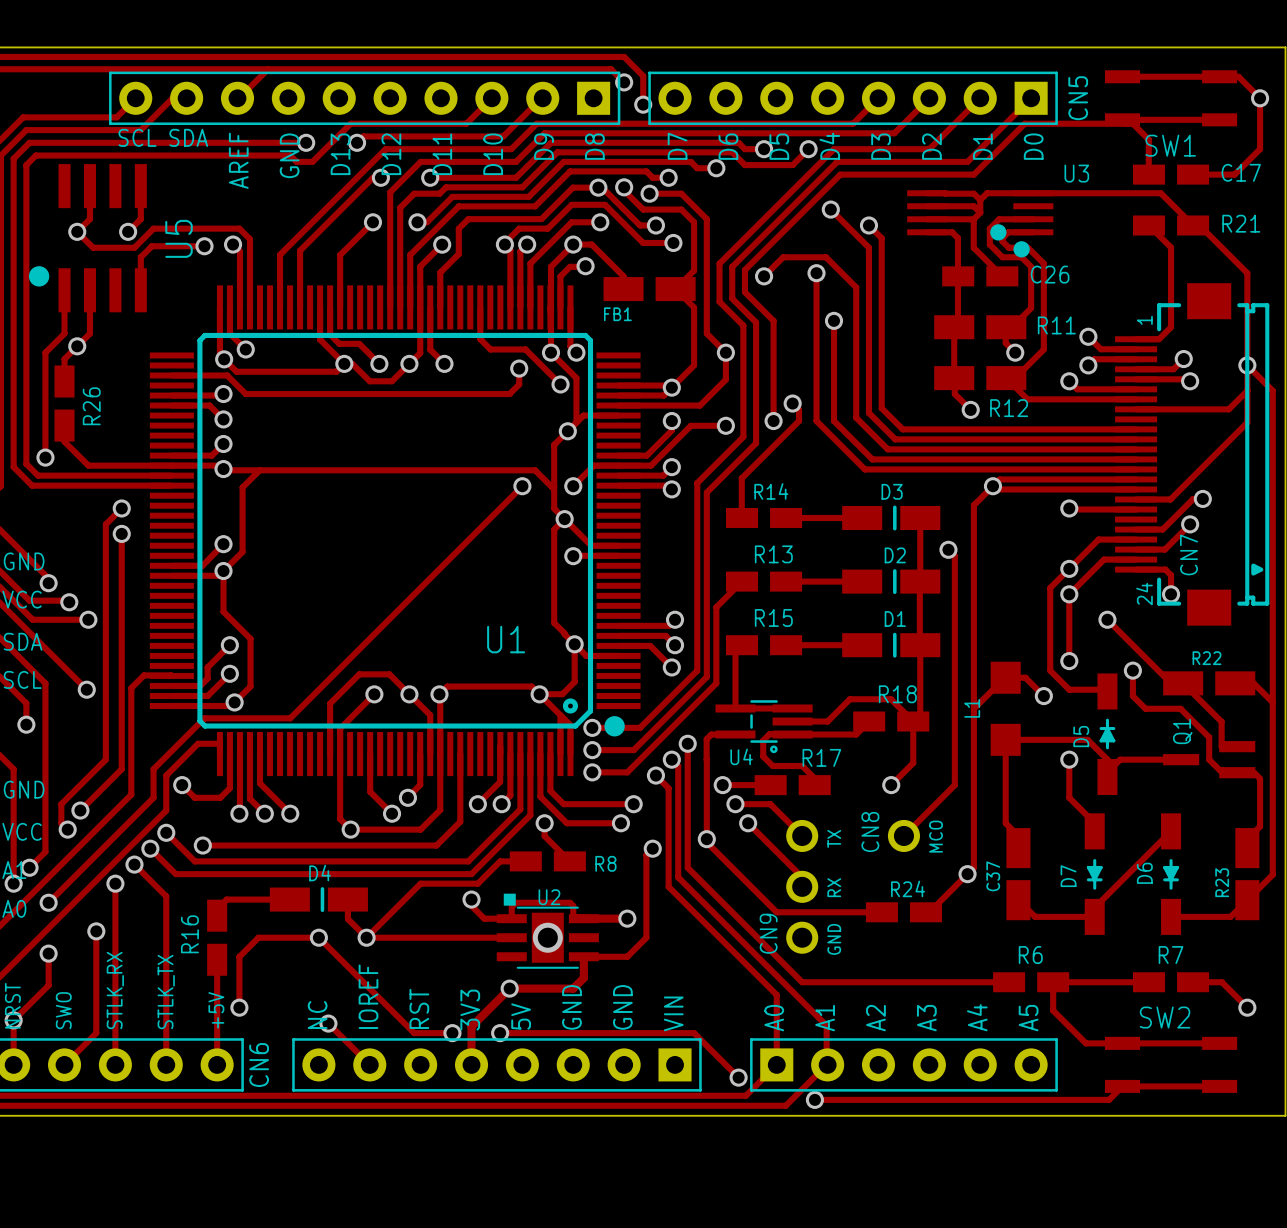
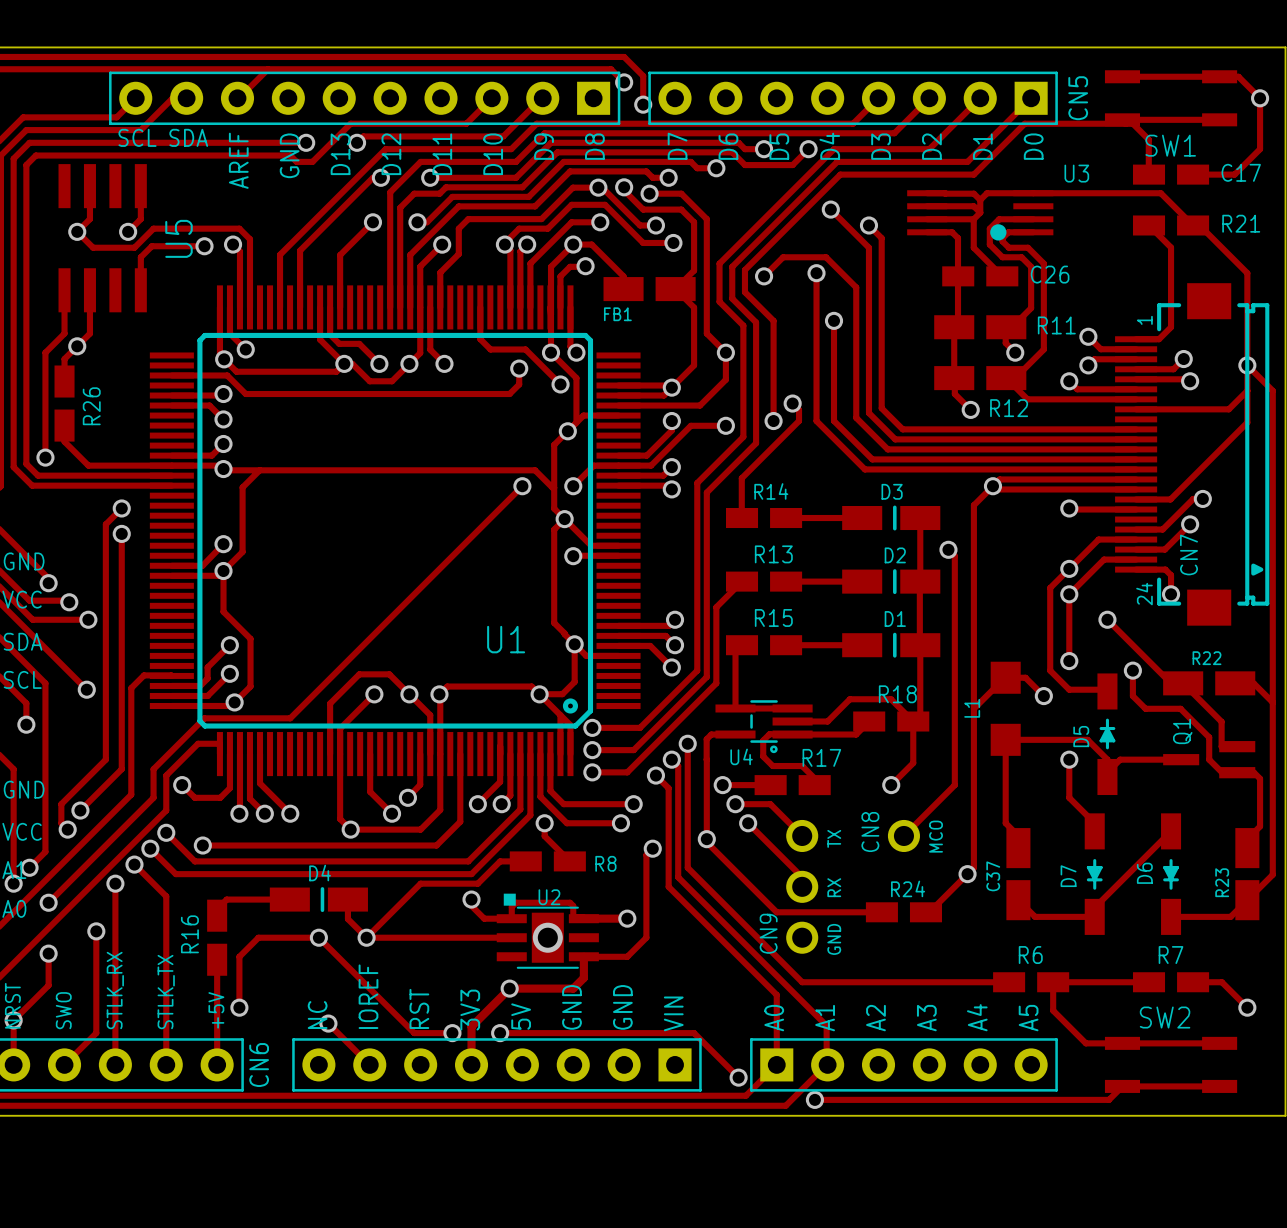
drawing: [1013, 241, 1030, 258] -> none
drawing: [28, 266, 50, 287] -> none
drawing: [604, 716, 625, 737] -> none

